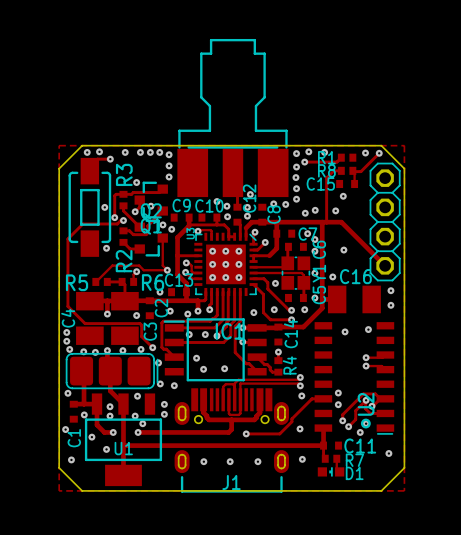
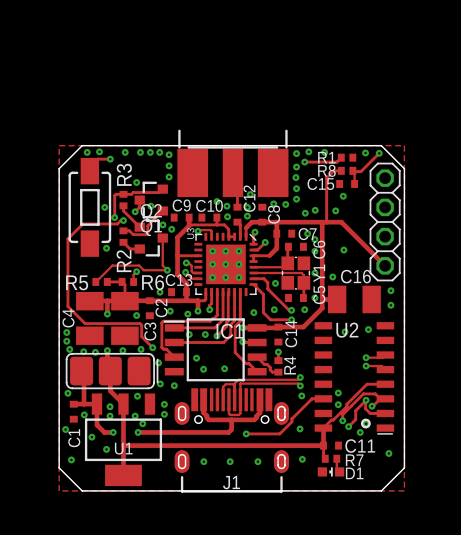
part: (232, 118) -> none
part: none -> (232, 163)
track: none -> (385, 384) (366, 384) (323, 428)
U2 name rotation: 0° (366, 404) -> 90° clockwise (347, 330)
U2 name position: U2 (366, 404) -> U2 (347, 330)

